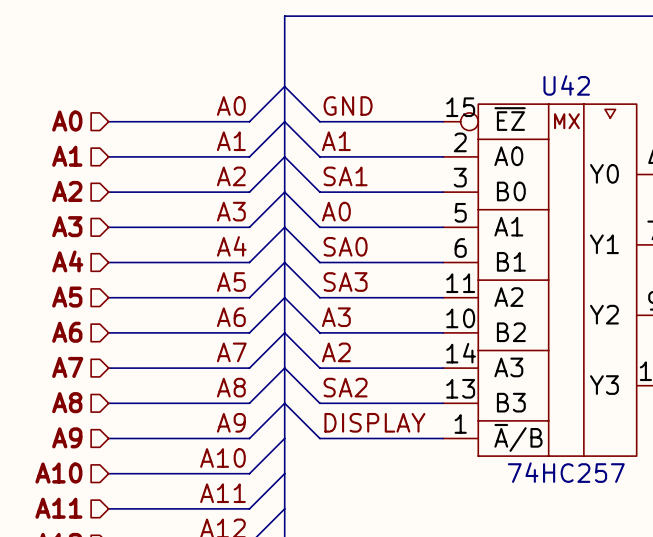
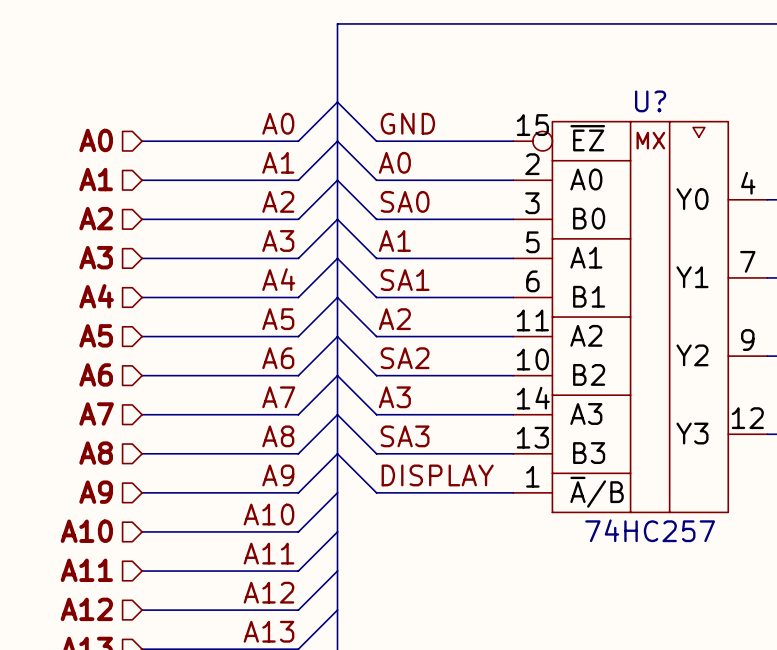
U42 name: U42 (566, 85) -> U? (650, 101)
label: A1 (336, 141) -> A0 (394, 162)
label: SA1 (345, 176) -> SA0 (405, 201)
label: A0 (336, 211) -> A1 (394, 240)
label: SA0 (345, 246) -> SA1 (405, 280)
label: SA3 (345, 282) -> A2 (394, 319)
label: A3 (336, 317) -> SA2 (405, 358)
label: A2 (336, 352) -> A3 (394, 397)
label: SA2 (345, 387) -> SA3 (405, 436)

